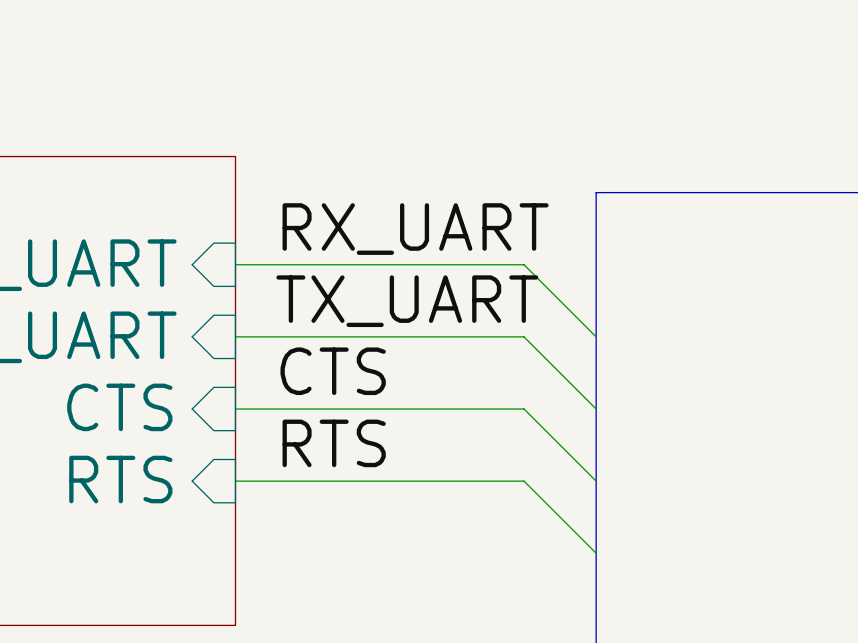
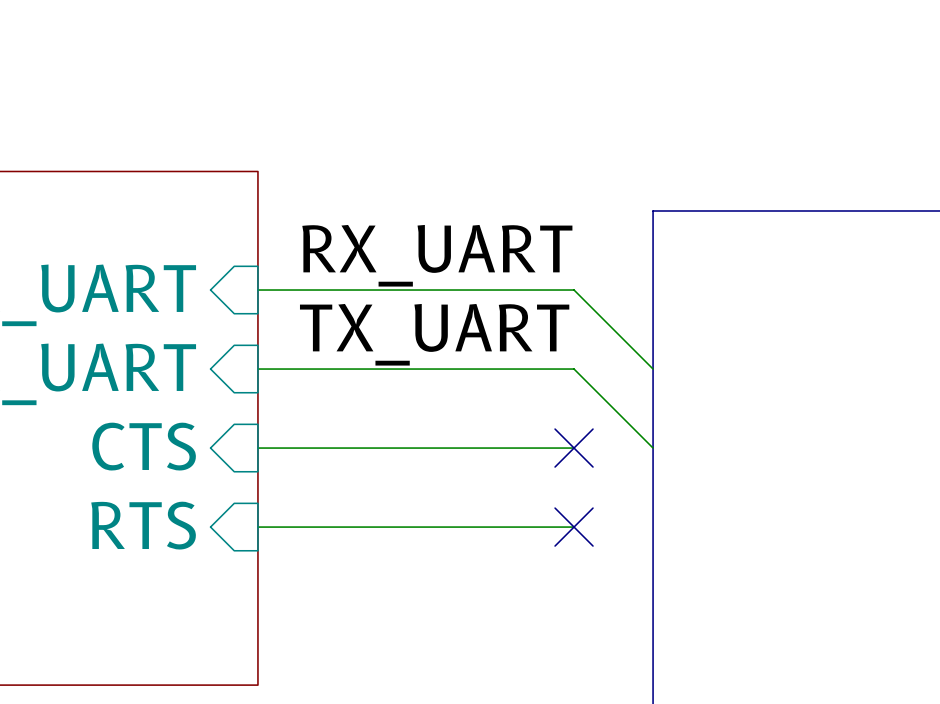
label: CTS (333, 371) -> none
wire: (524, 409) (596, 481) -> none
no-connect mark: none -> (574, 448)
label: RTS (334, 443) -> none
wire: (524, 481) (596, 553) -> none
no-connect mark: none -> (574, 527)

